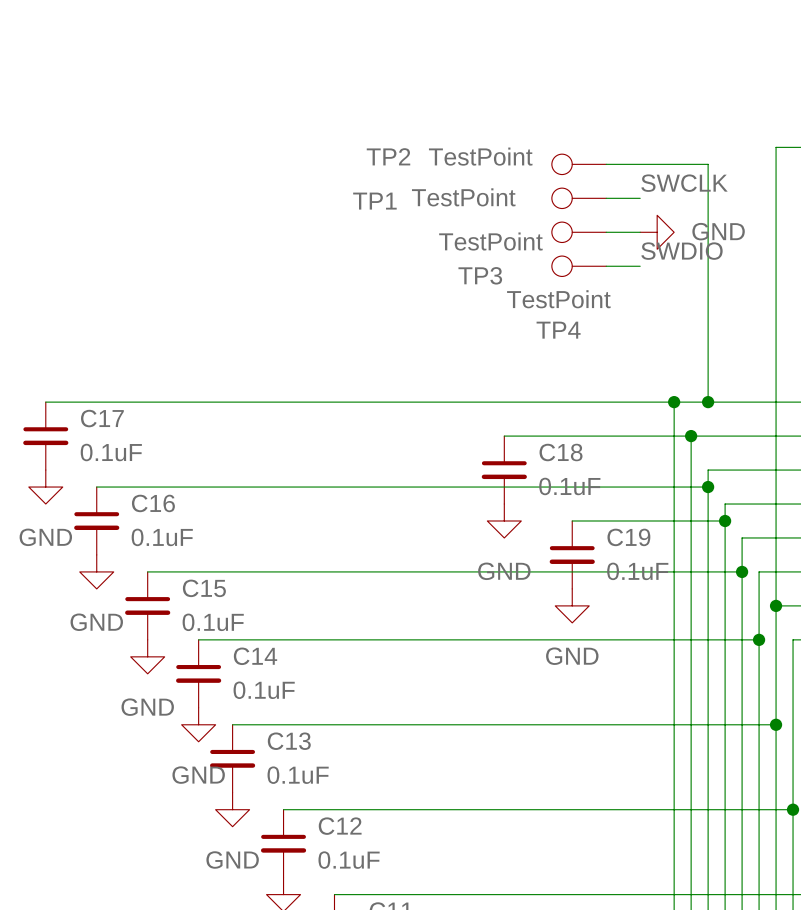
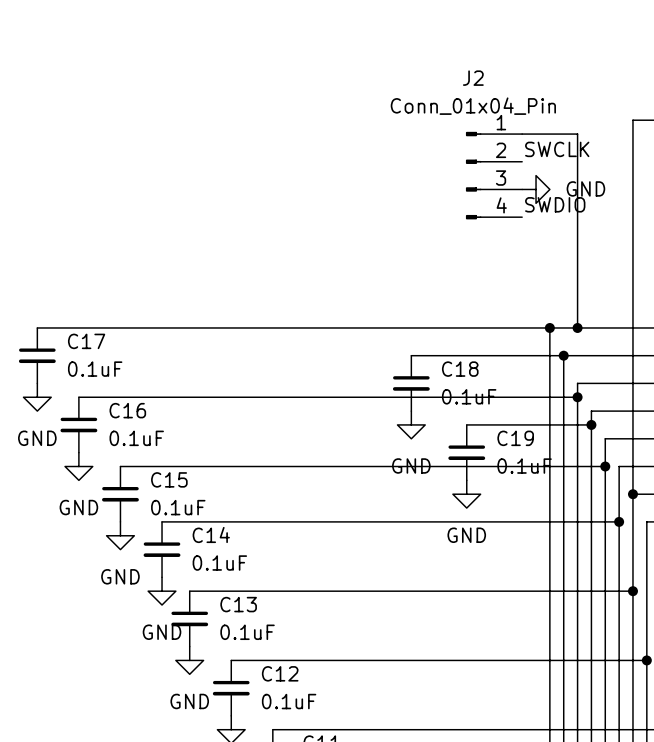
TP1: TestPoint (579, 164) -> none
TP2: TestPoint (579, 198) -> none
J2: none -> Conn_01x04_Pin (494, 175)
TP3: TestPoint (579, 232) -> none
TP4: TestPoint (579, 266) -> none

